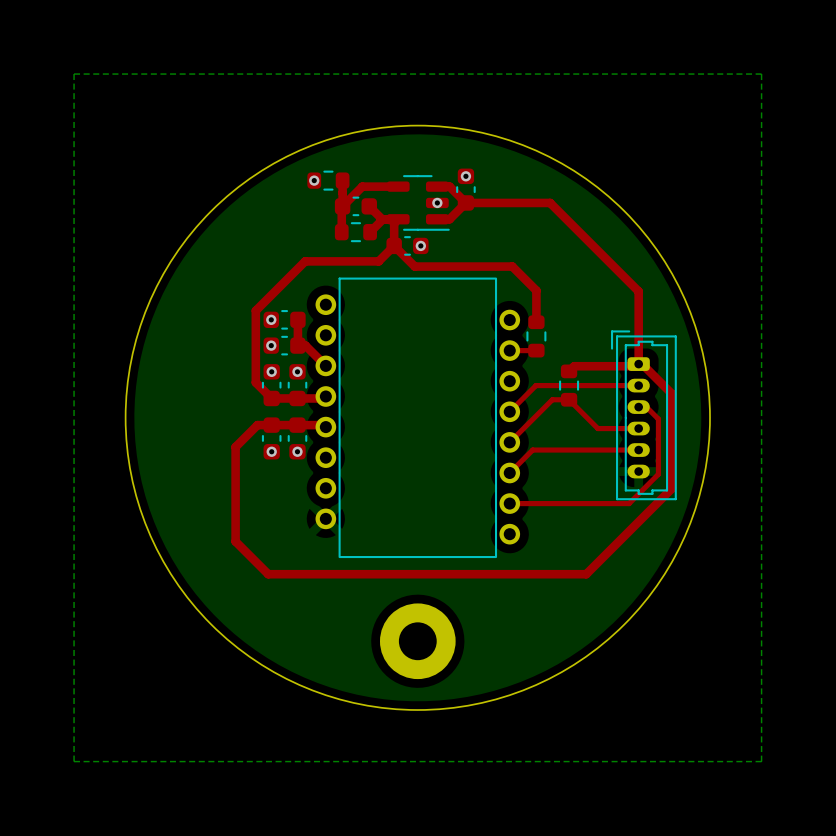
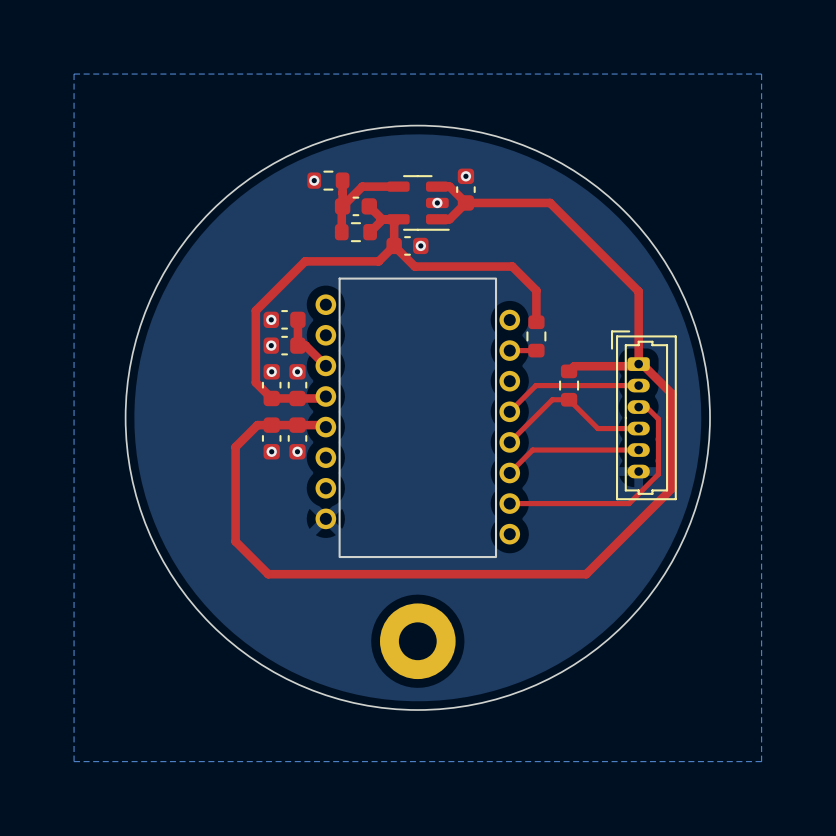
part footprint: [315, 277, 521, 559] -> [315, 277, 521, 559]

